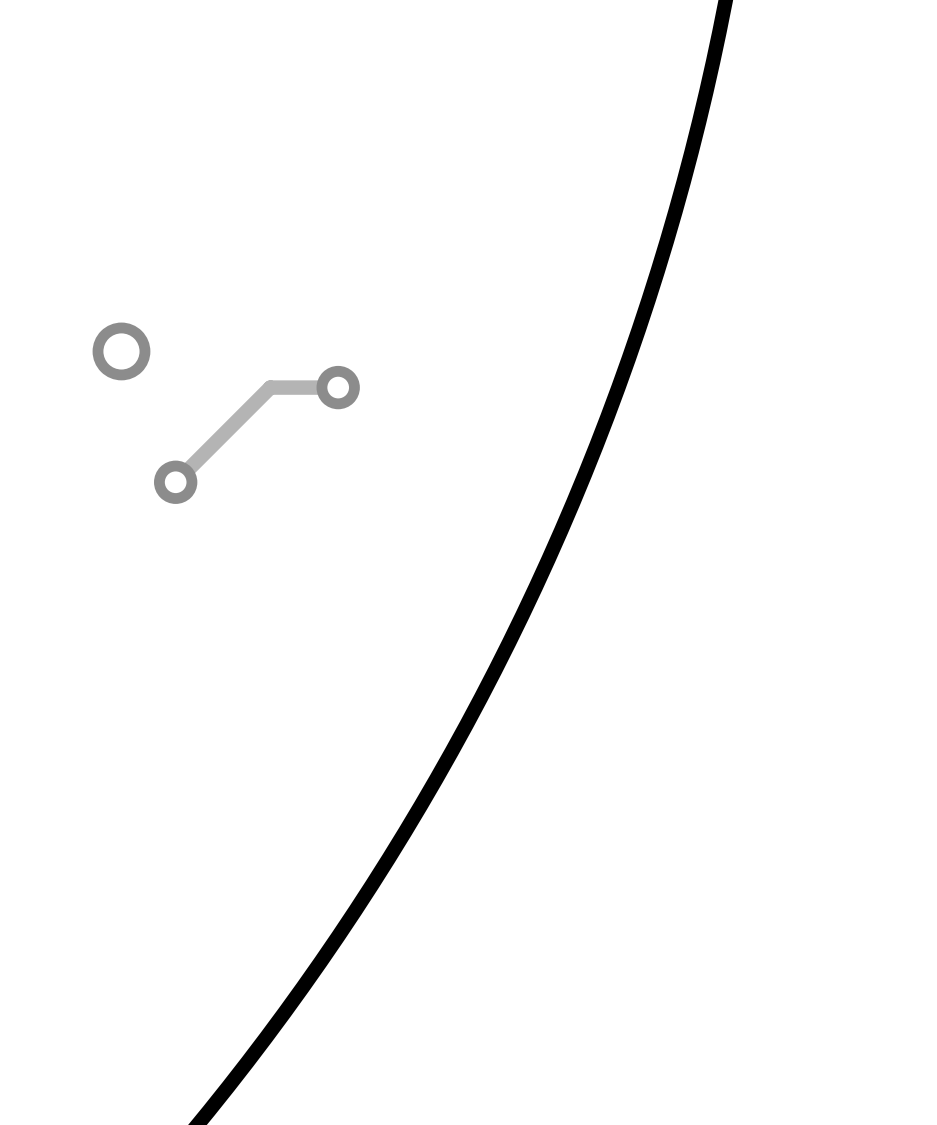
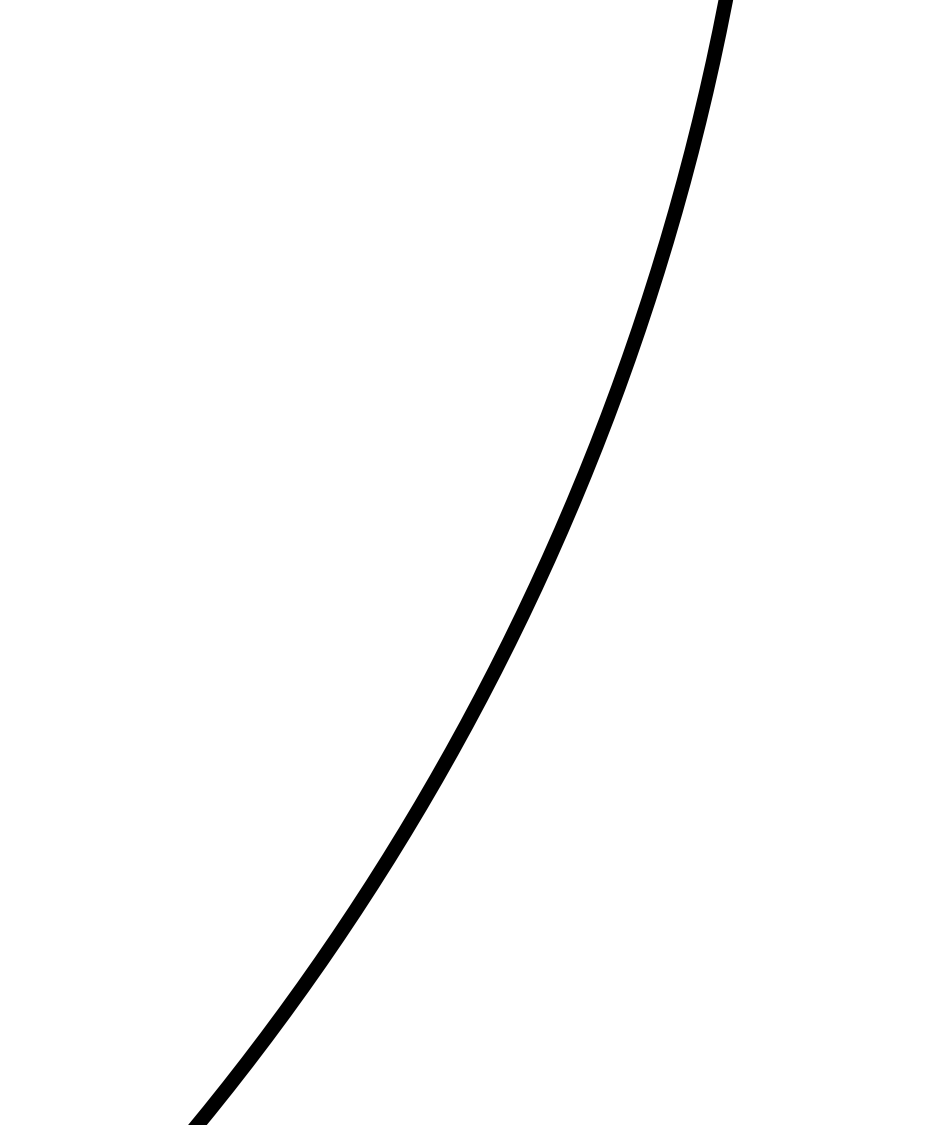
via: (121, 351) -> none
track: (338, 387) (270, 387) (175, 482) -> none
via: (338, 387) -> none
via: (175, 482) -> none

